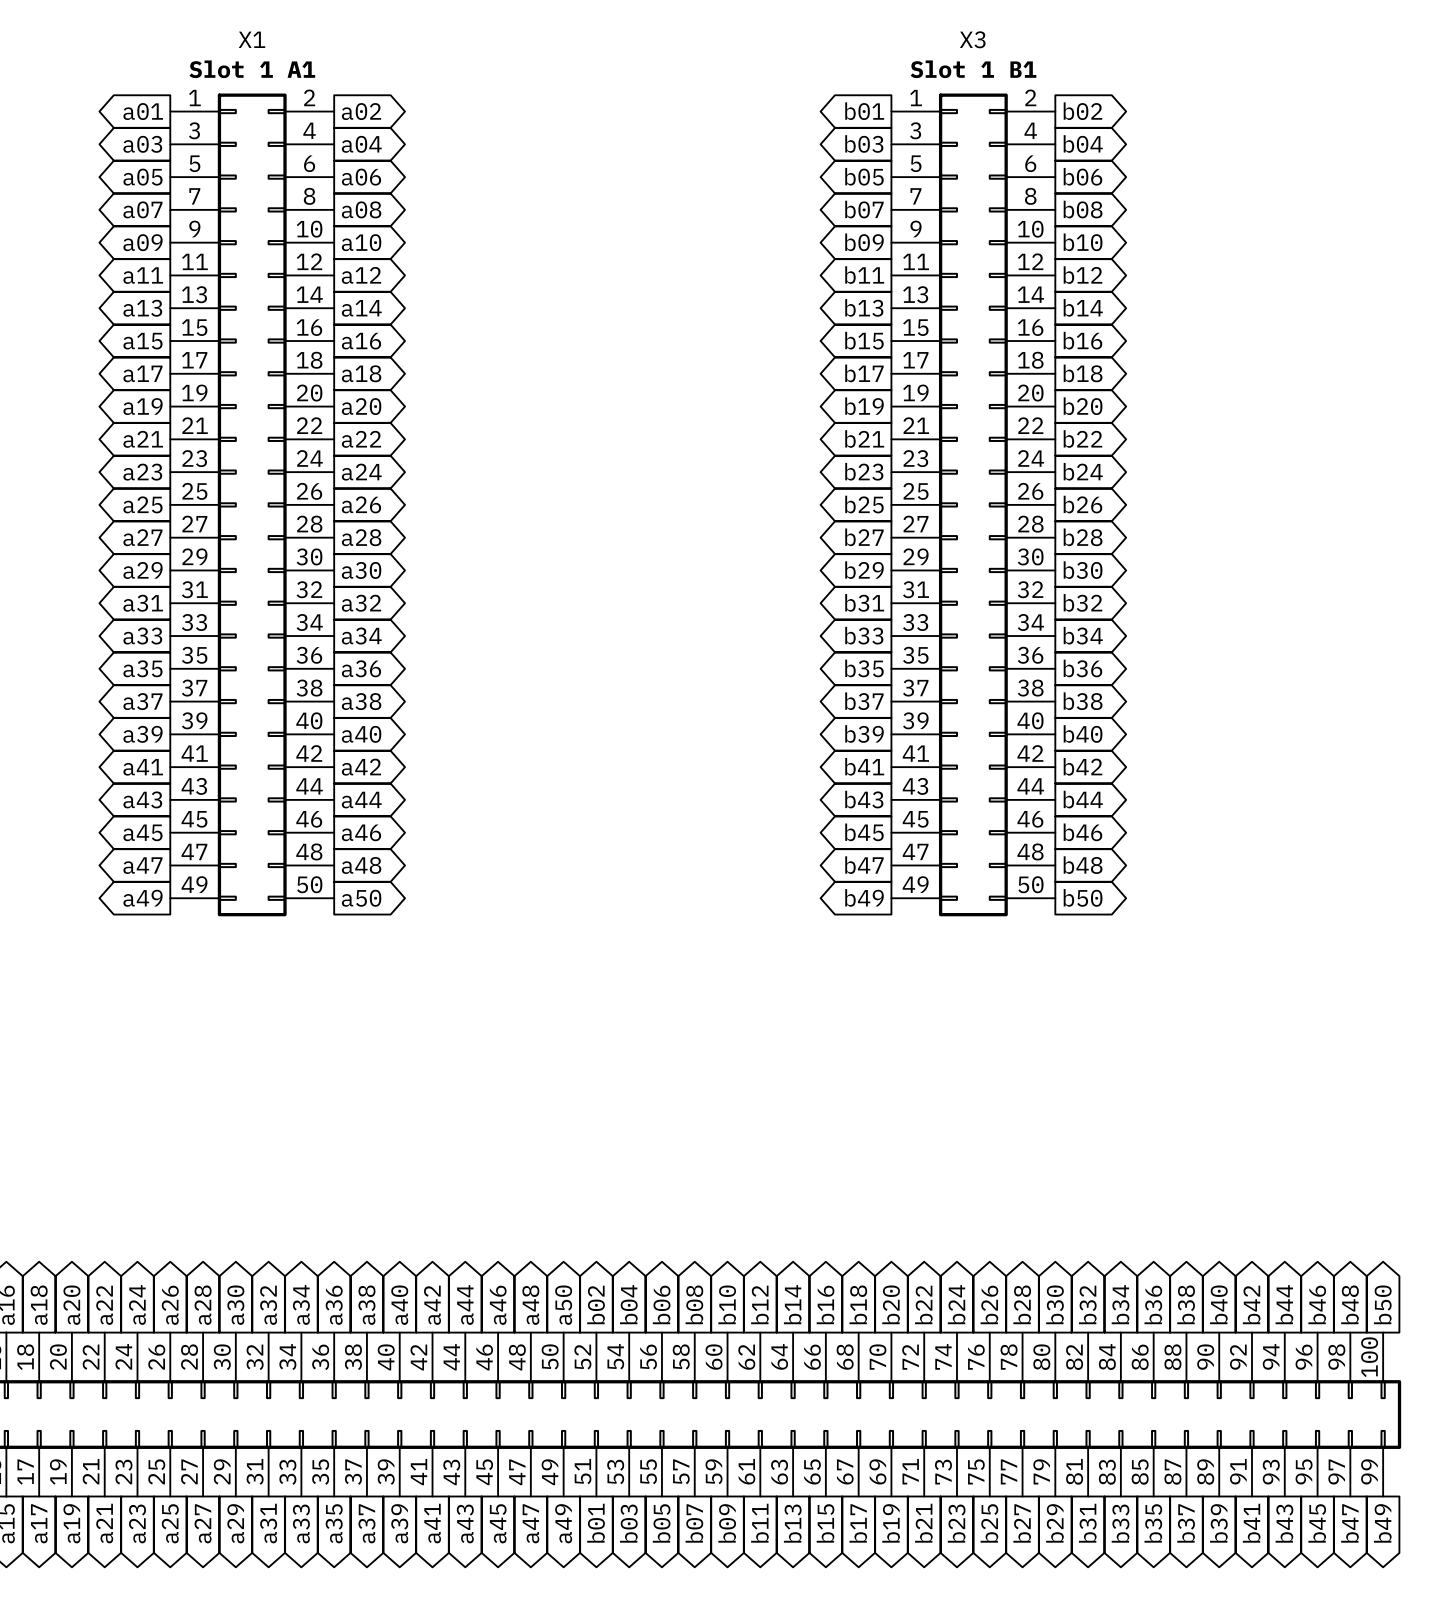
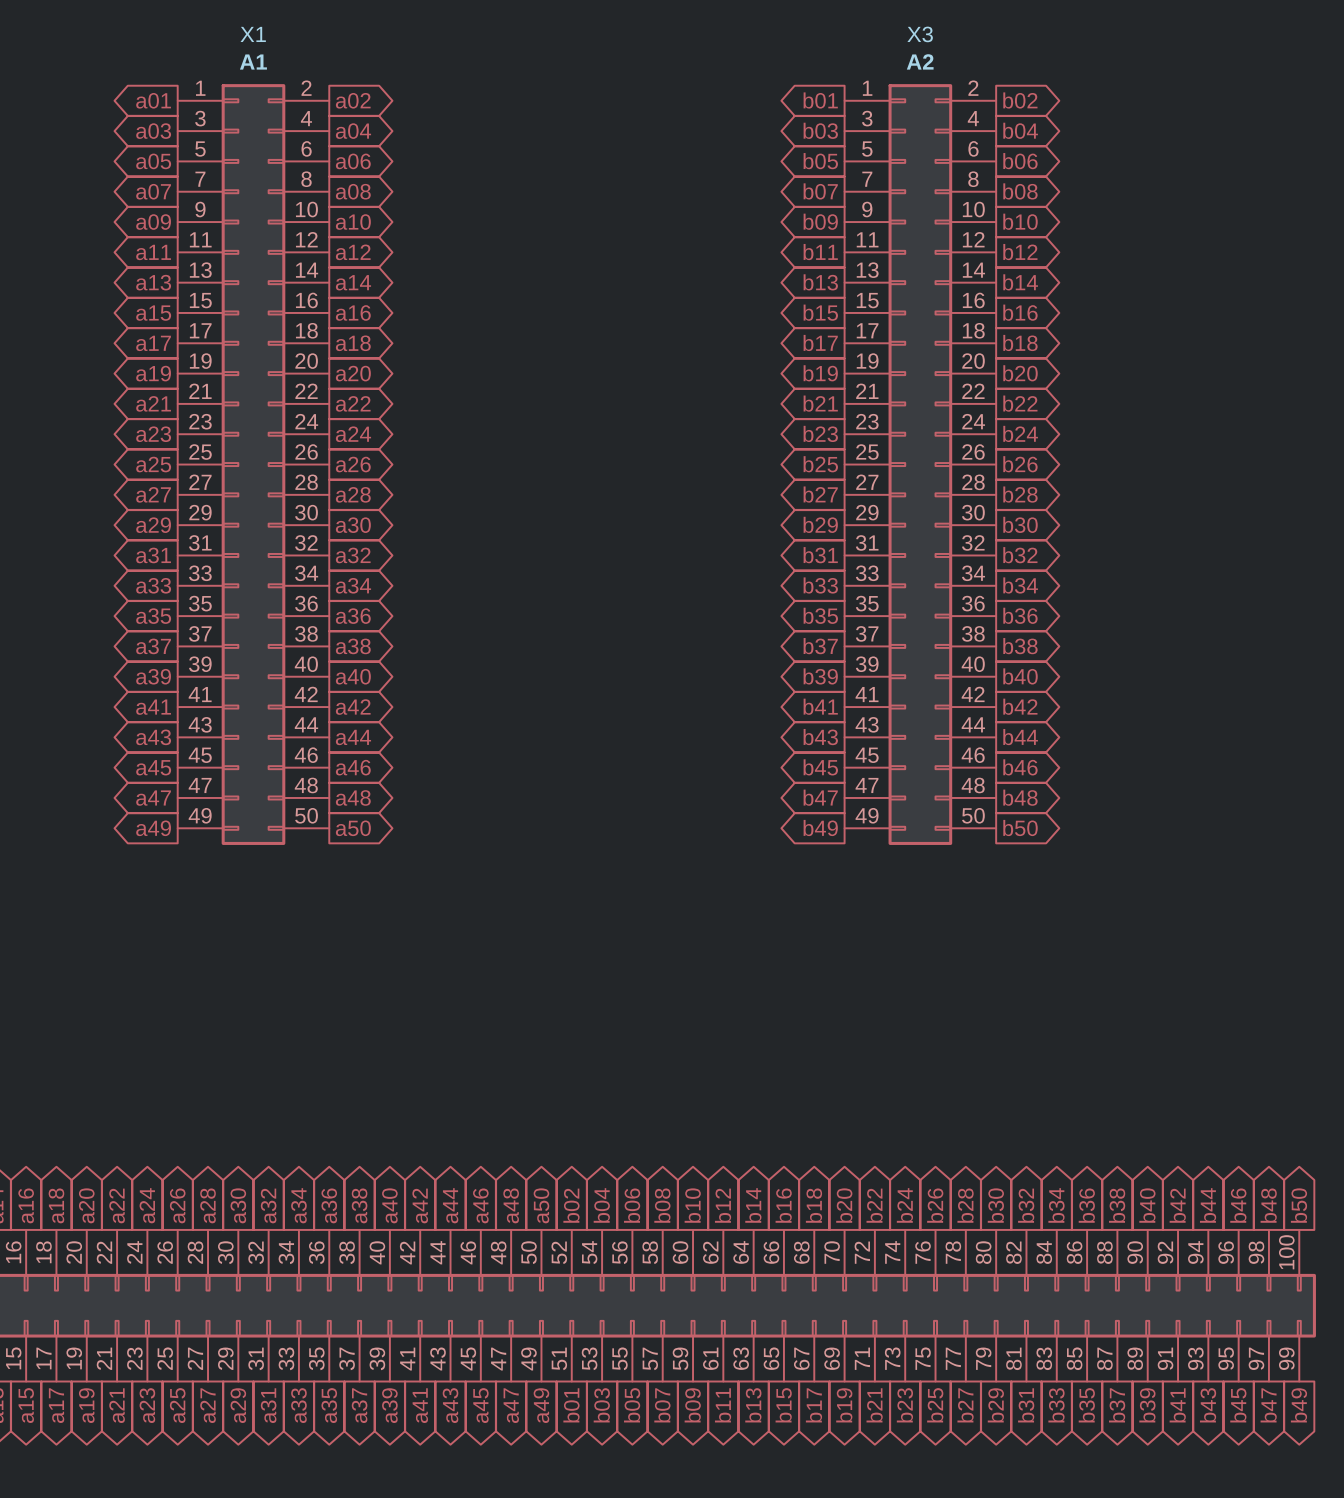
X1 value: Slot 1 A1 (252, 69) -> A1 (253, 62)
X3 value: Slot 1 B1 (973, 69) -> A2 (920, 61)

